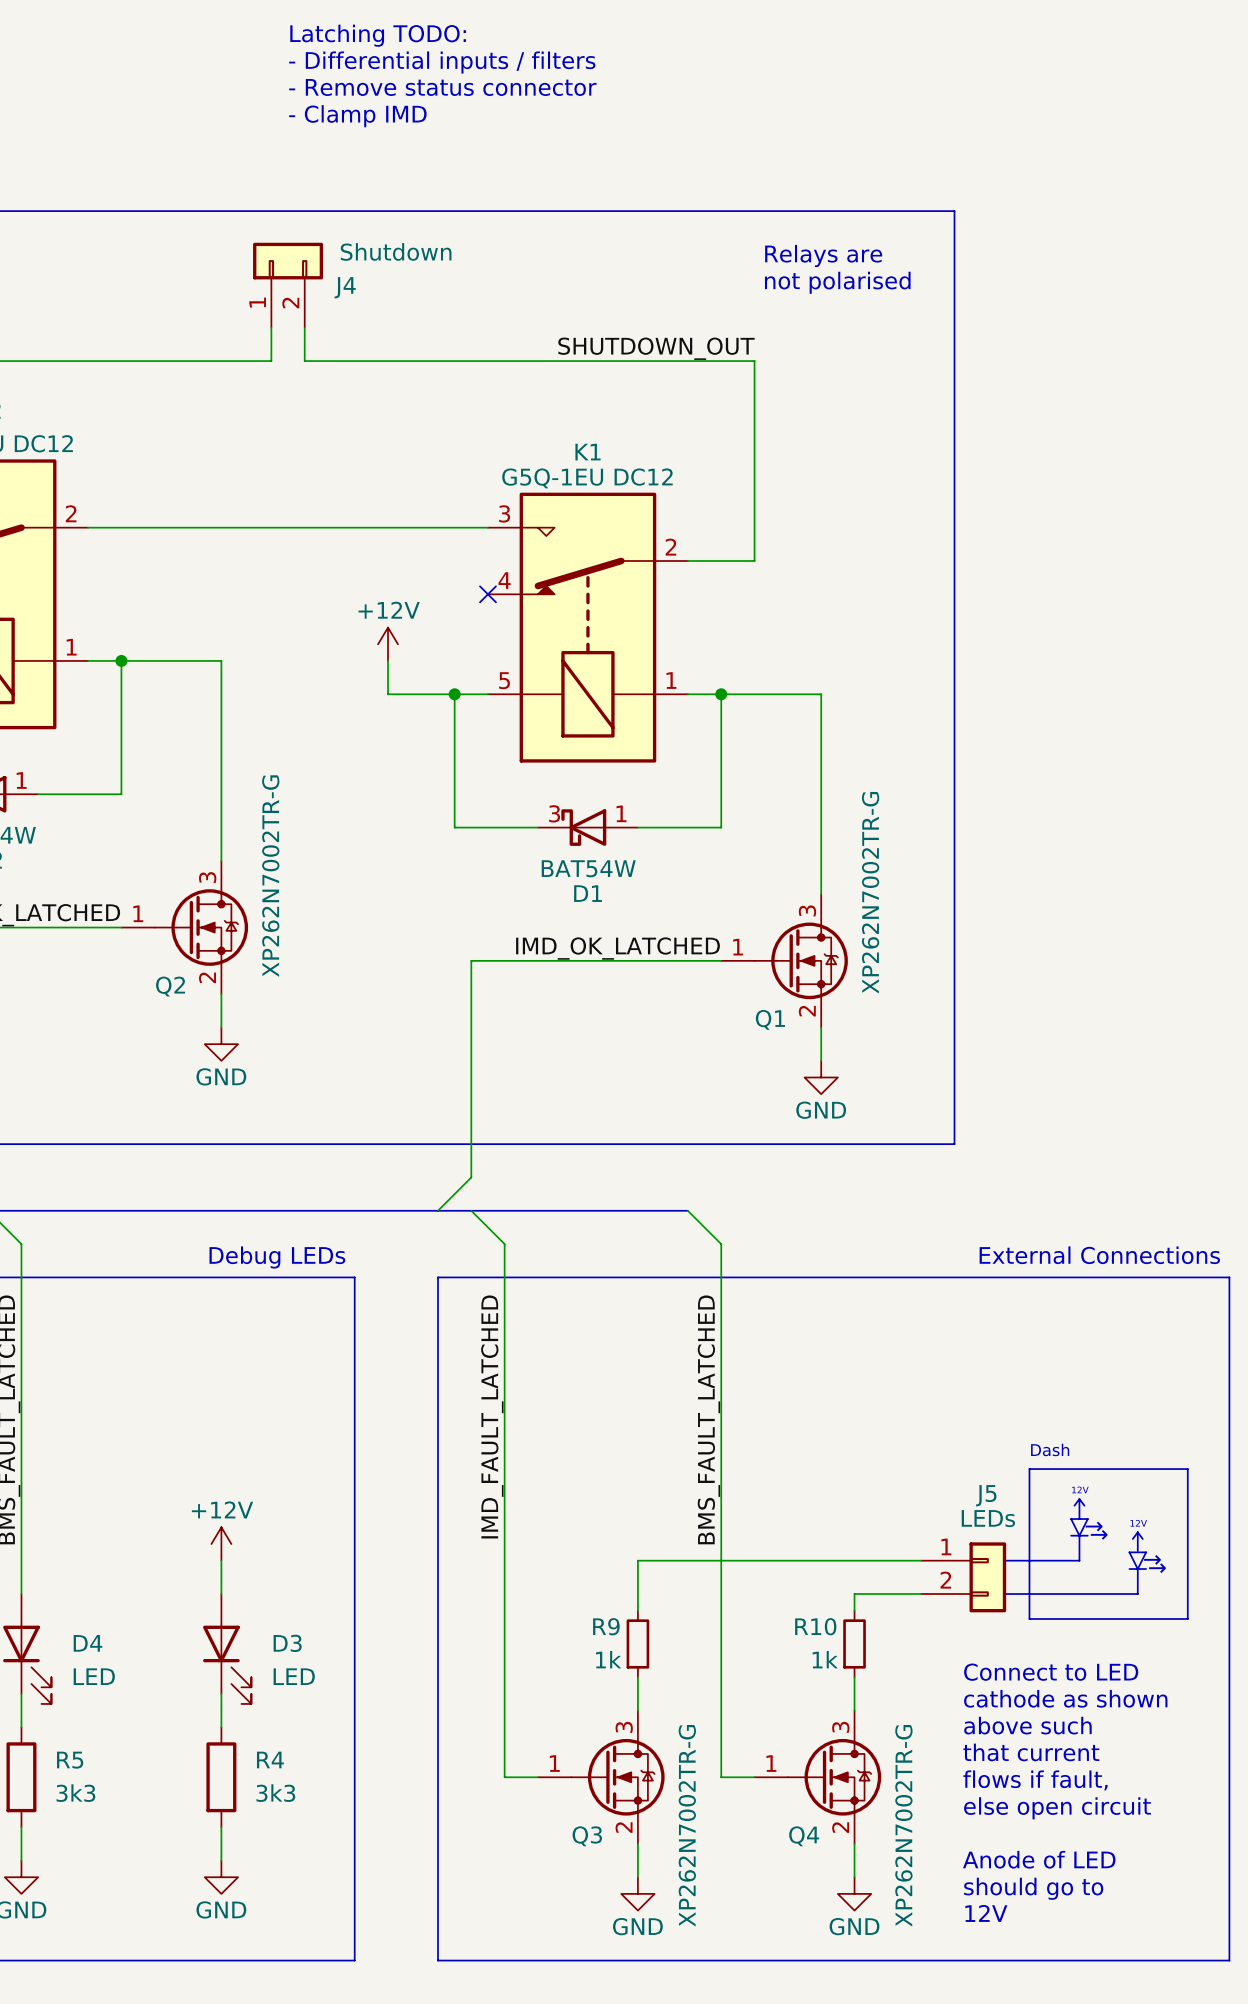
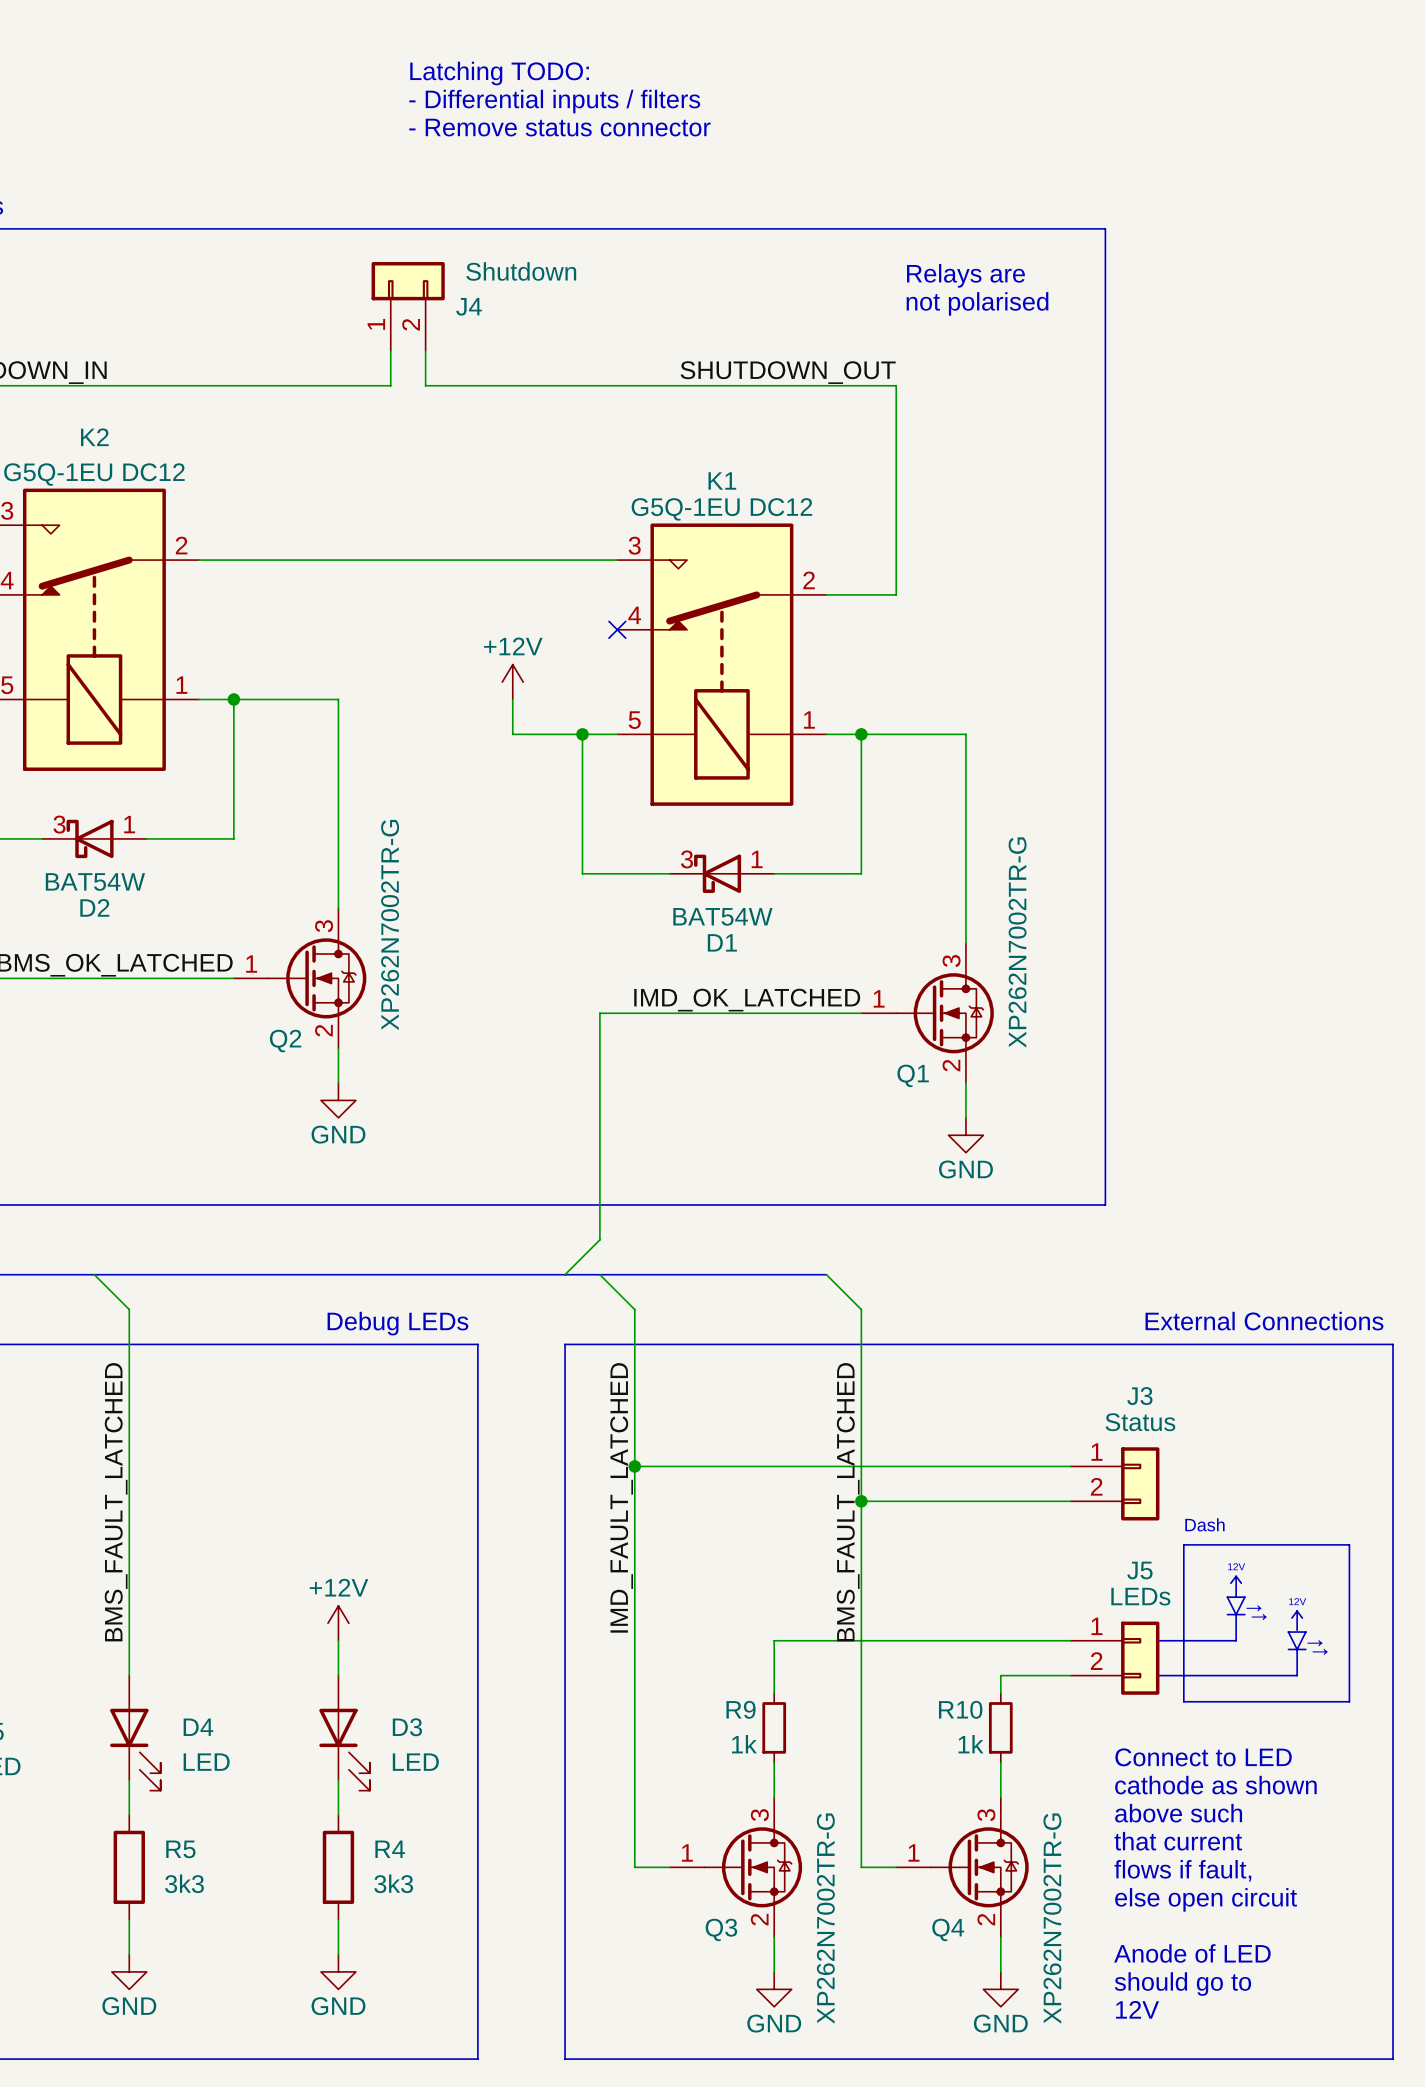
text: Latching TODO: (378, 35) -> none
text: - Differential inputs / filters (442, 62) -> Latching TODO: (499, 73)
text: - Remove status connector (442, 87) -> - Differential inputs / filters (554, 101)
text: - Clamp IMD (357, 116) -> - Remove status connector (559, 127)
wire: none -> (634, 1466) (1070, 1466)
junction: none -> (634, 1466)
J3: none -> Status (1114, 1483)
wire: none -> (861, 1501) (1070, 1501)
junction: none -> (861, 1501)

